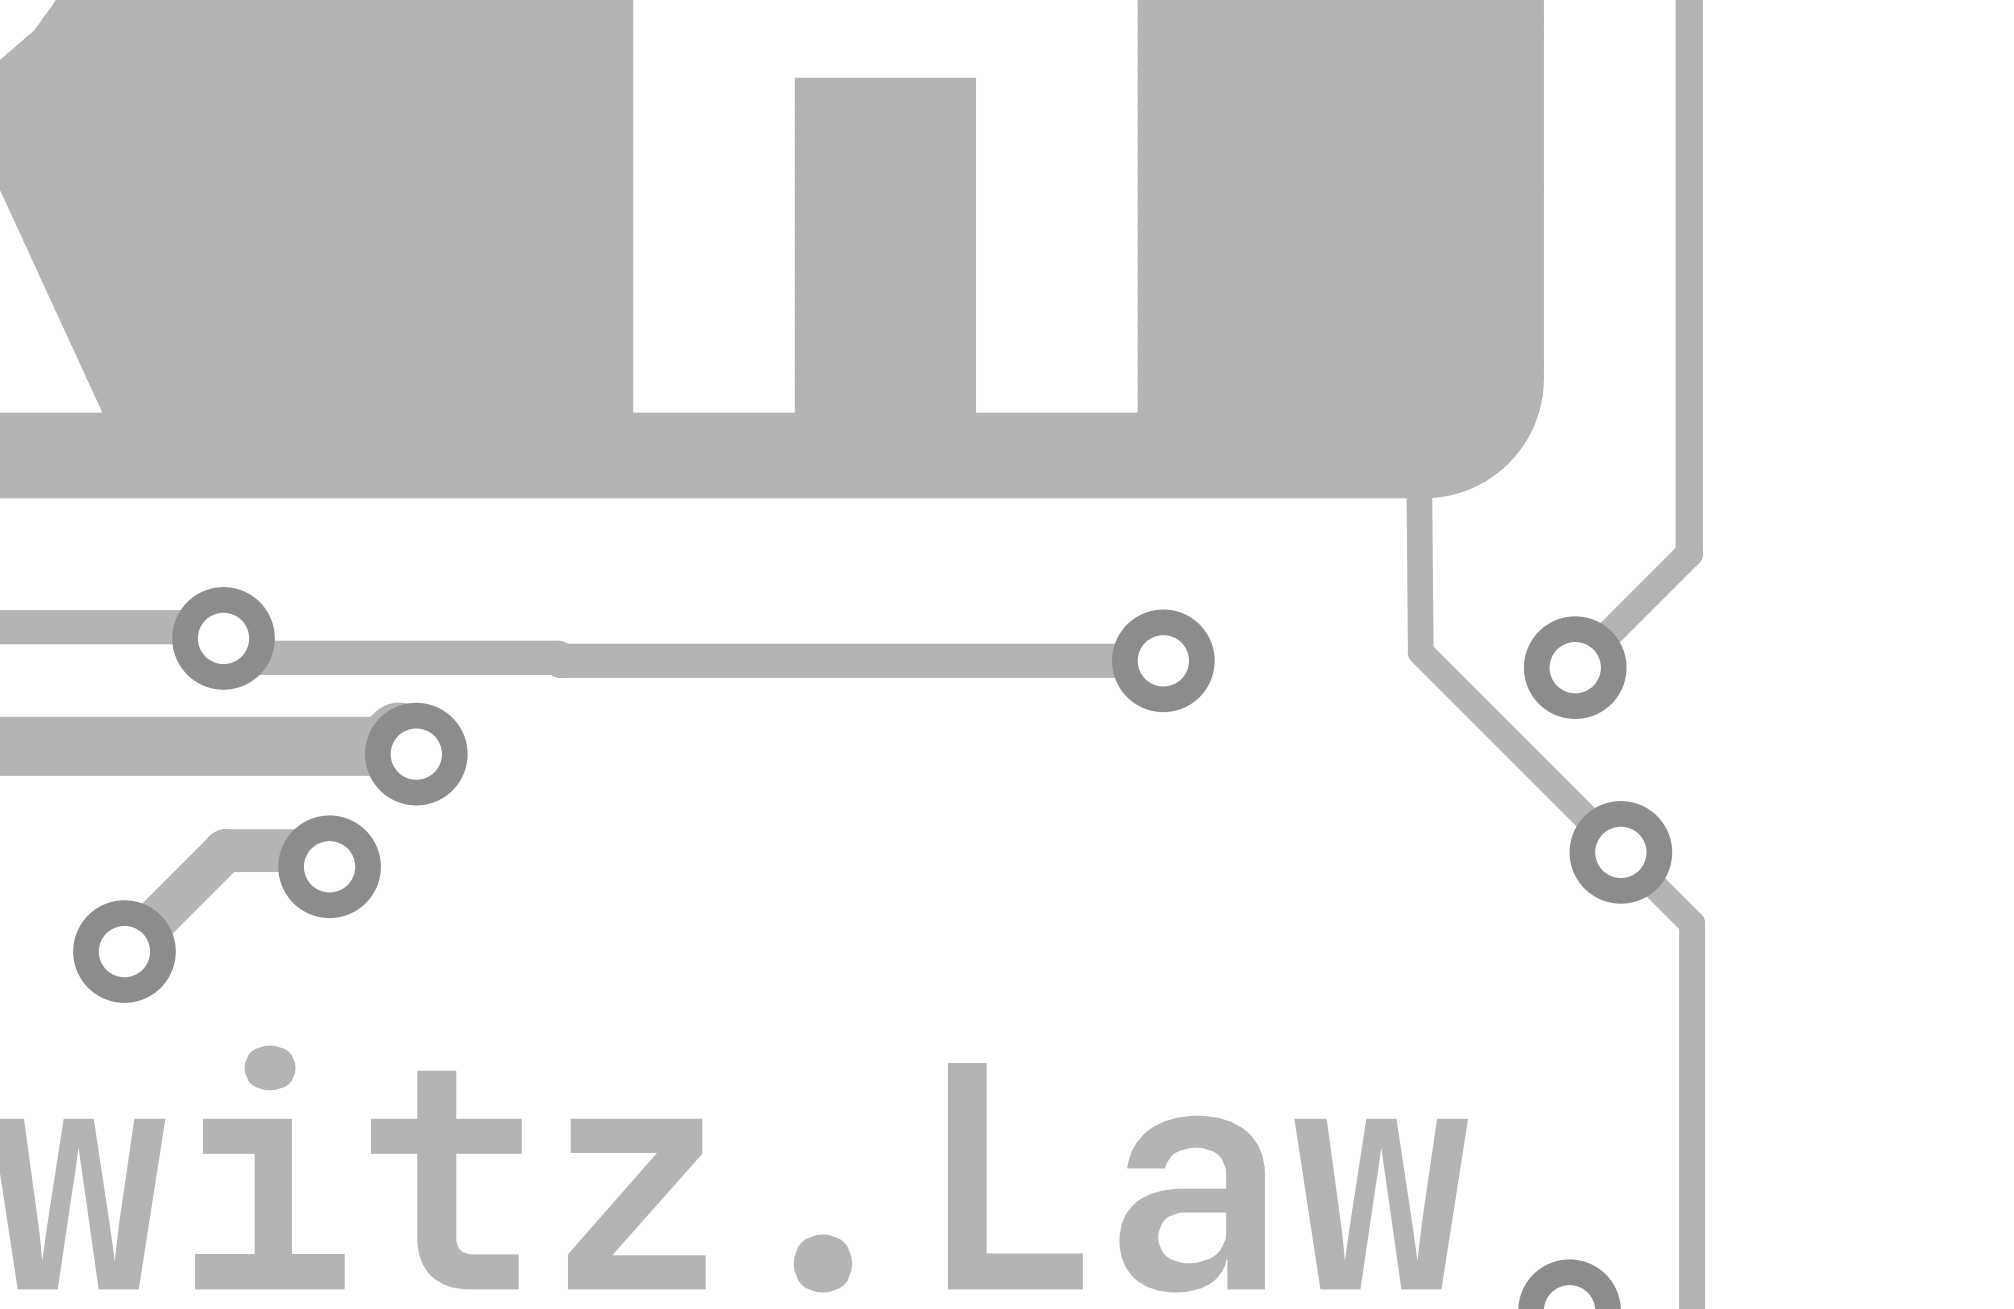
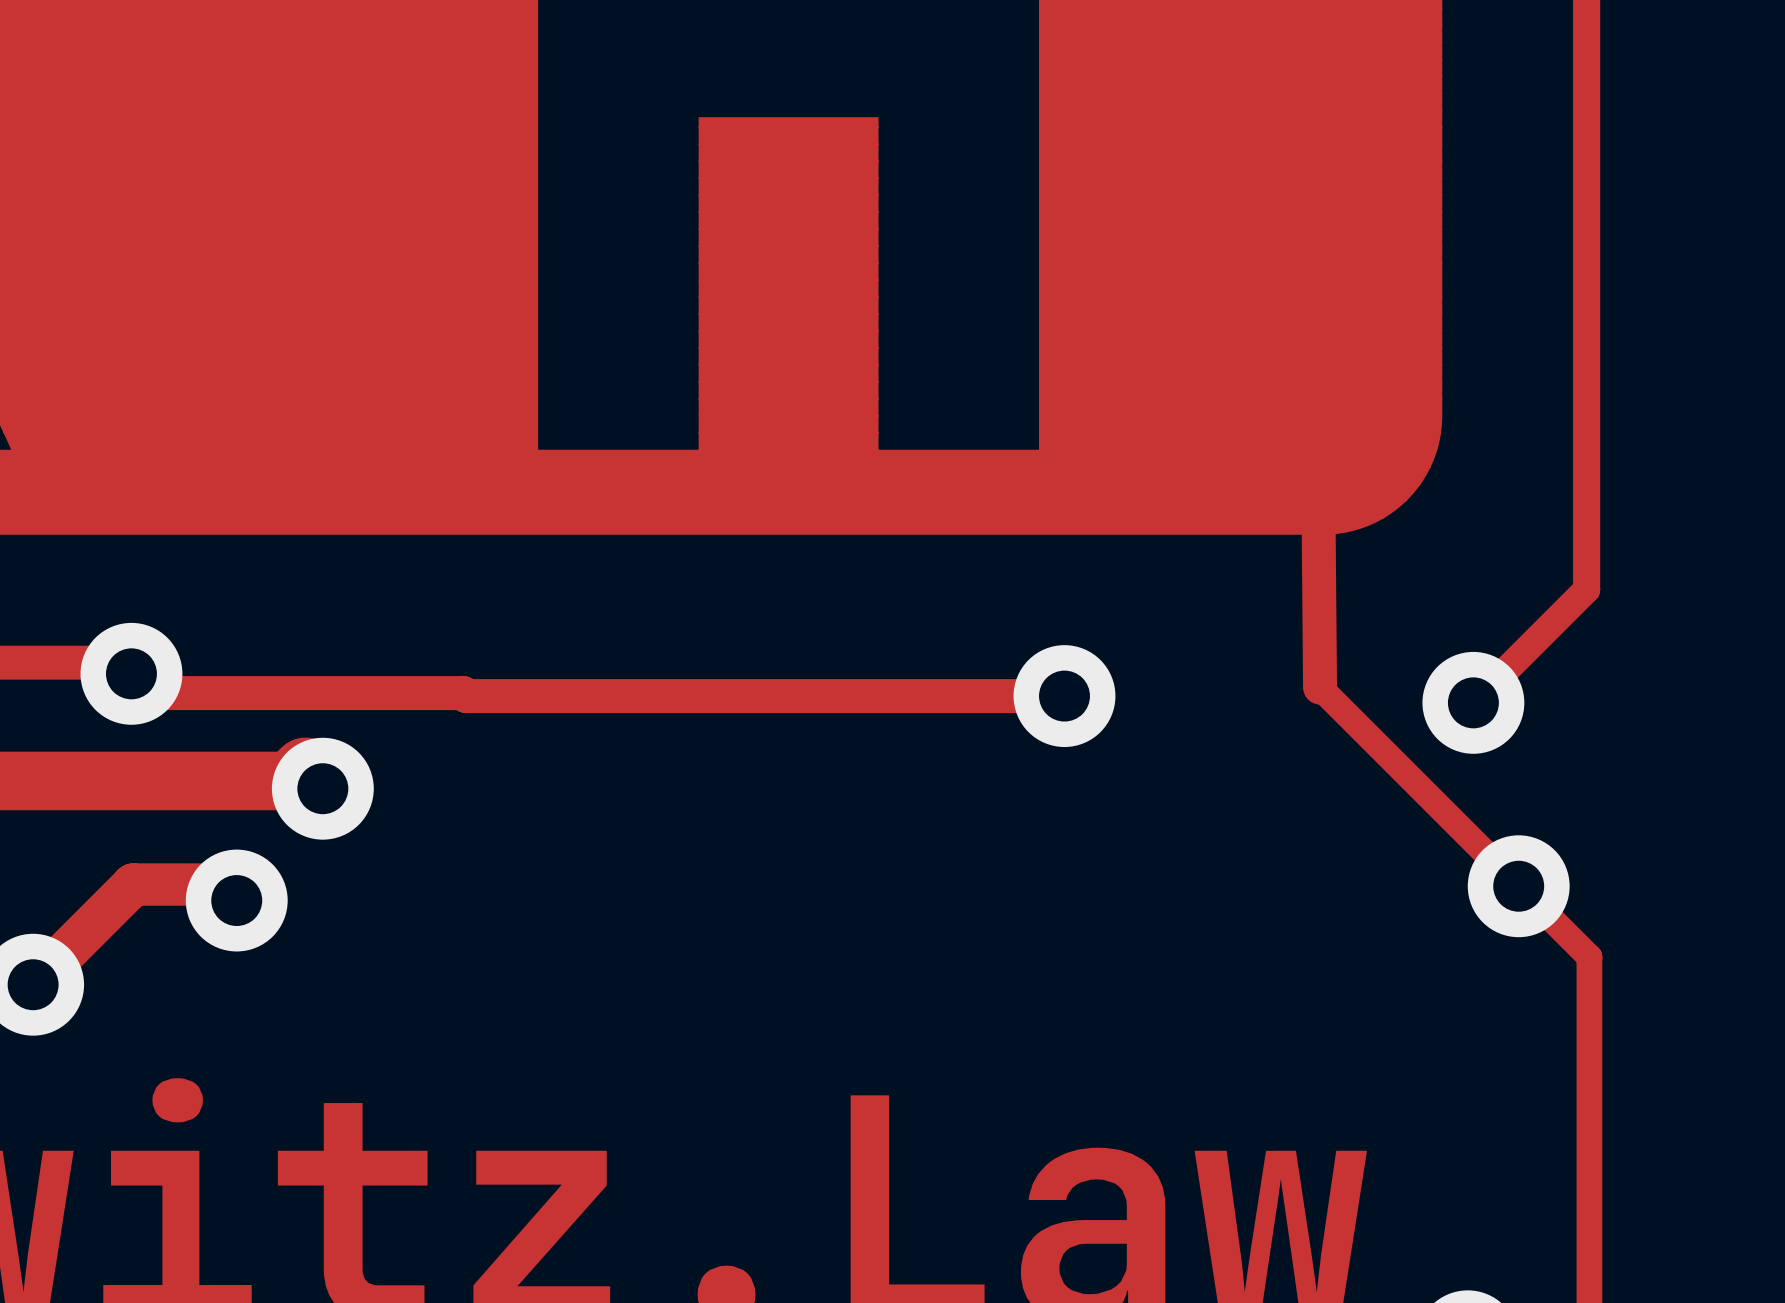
track width: thin (1419, 455) (1420, 652) -> thick (1318, 492) (1320, 687)

